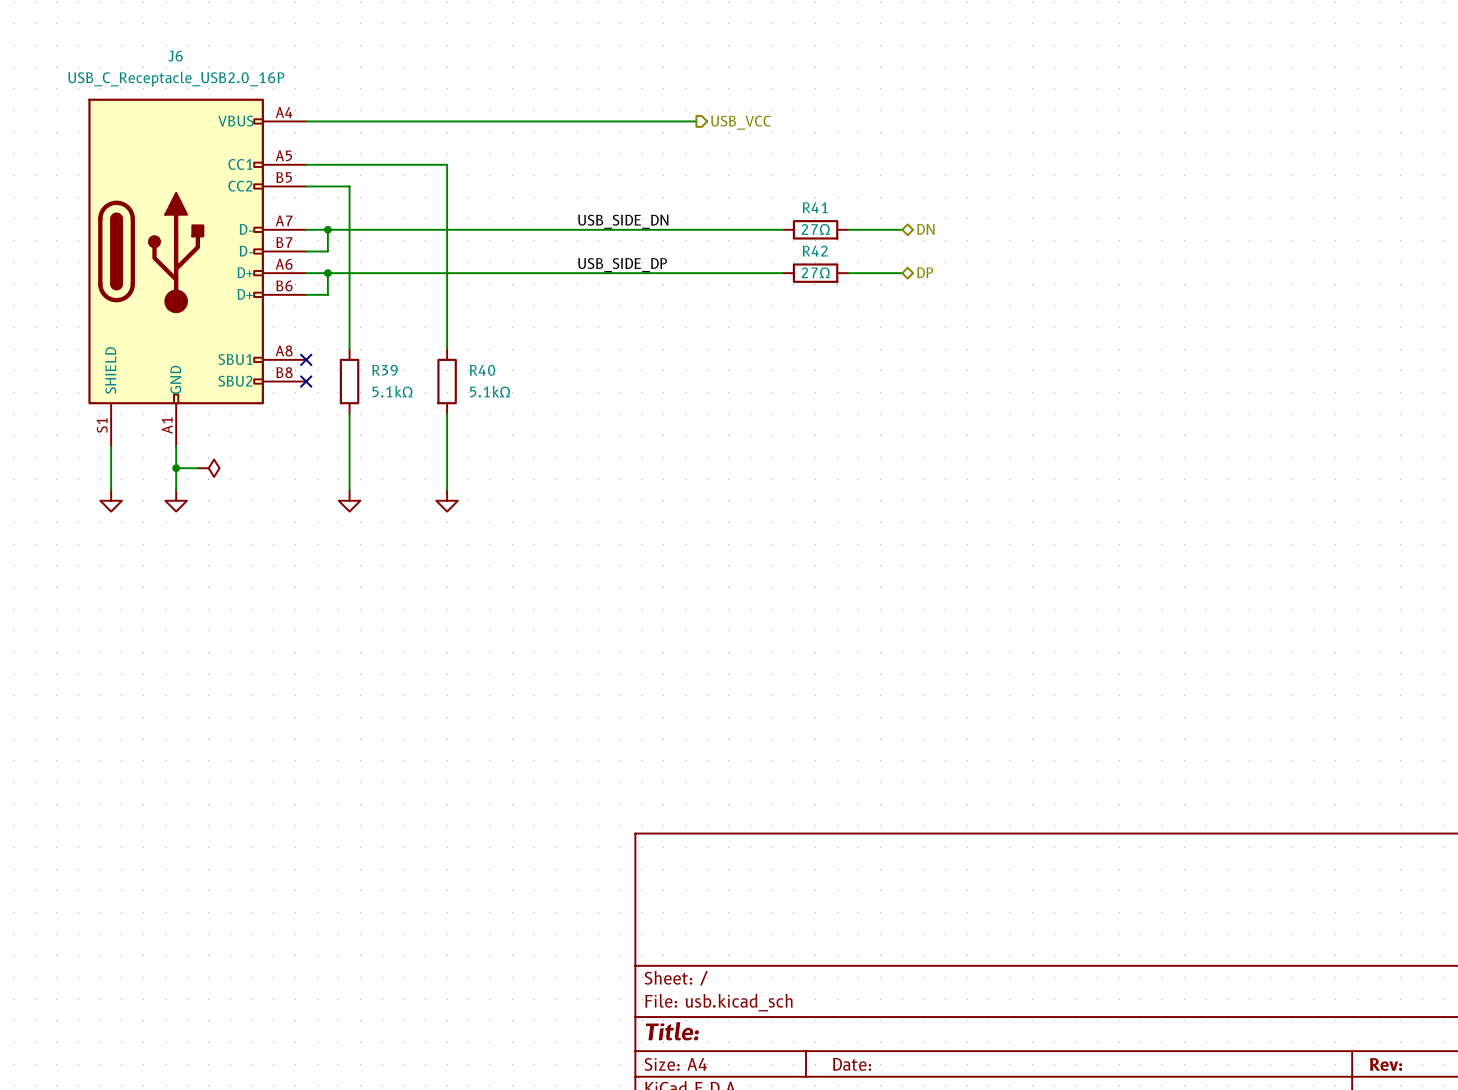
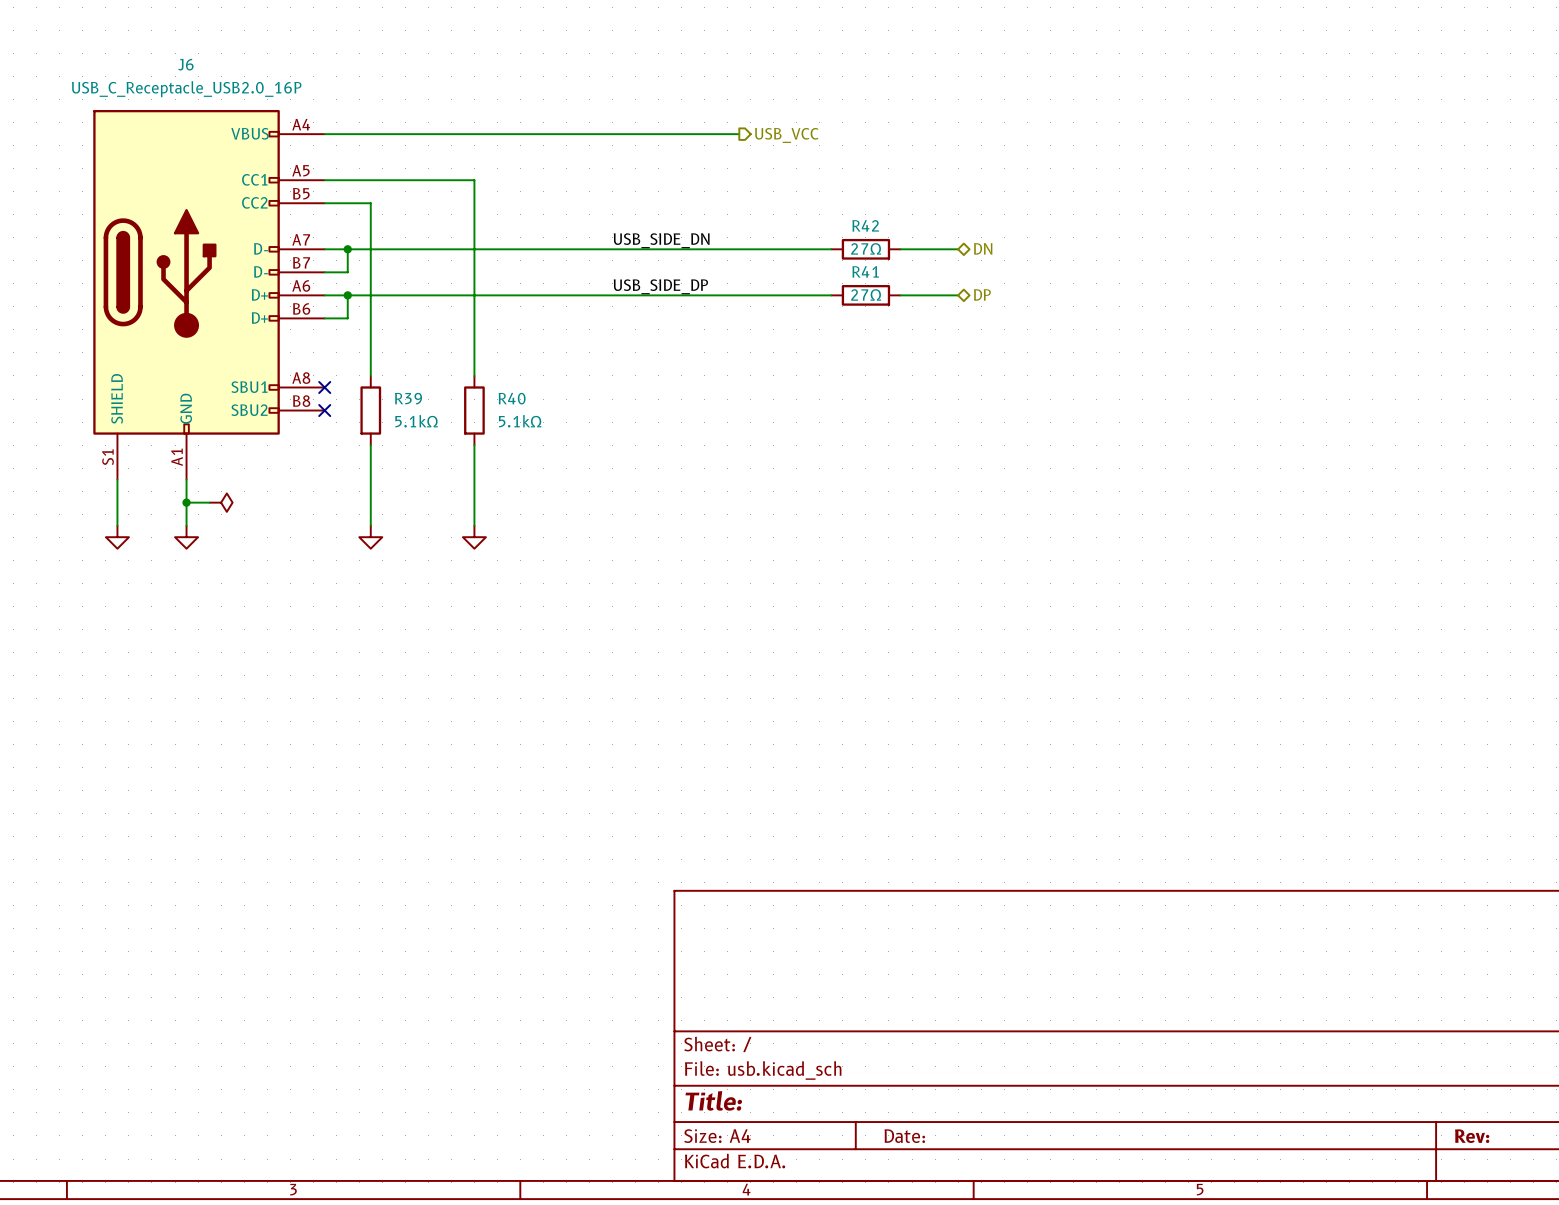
R41 name: R41 (815, 207) -> R42 (865, 225)
R42 name: R42 (815, 251) -> R41 (865, 271)

